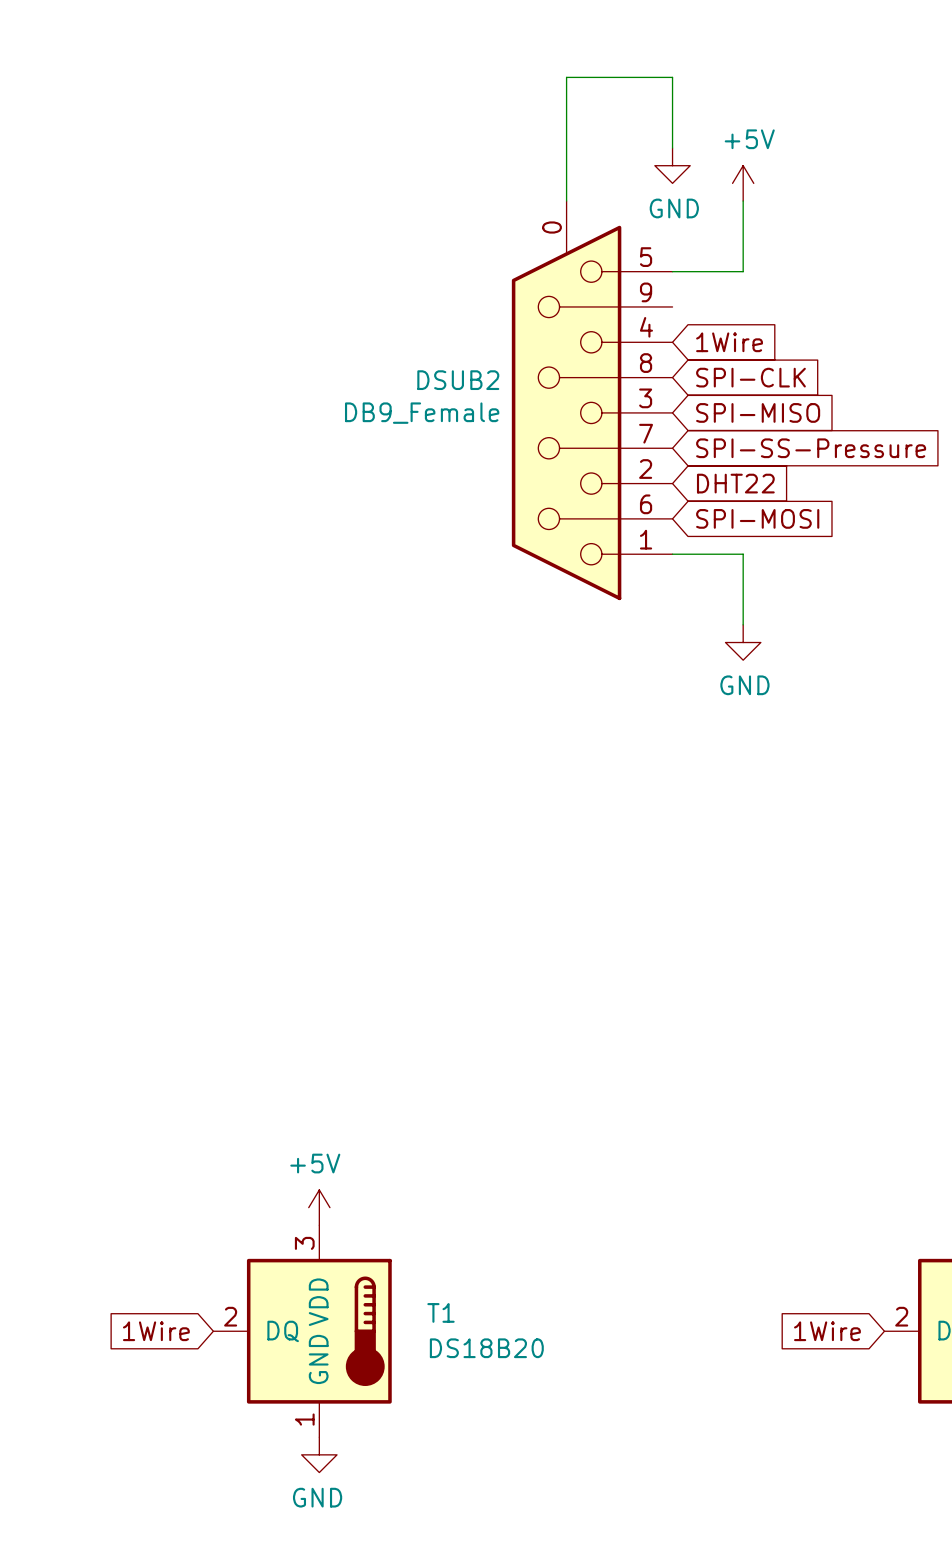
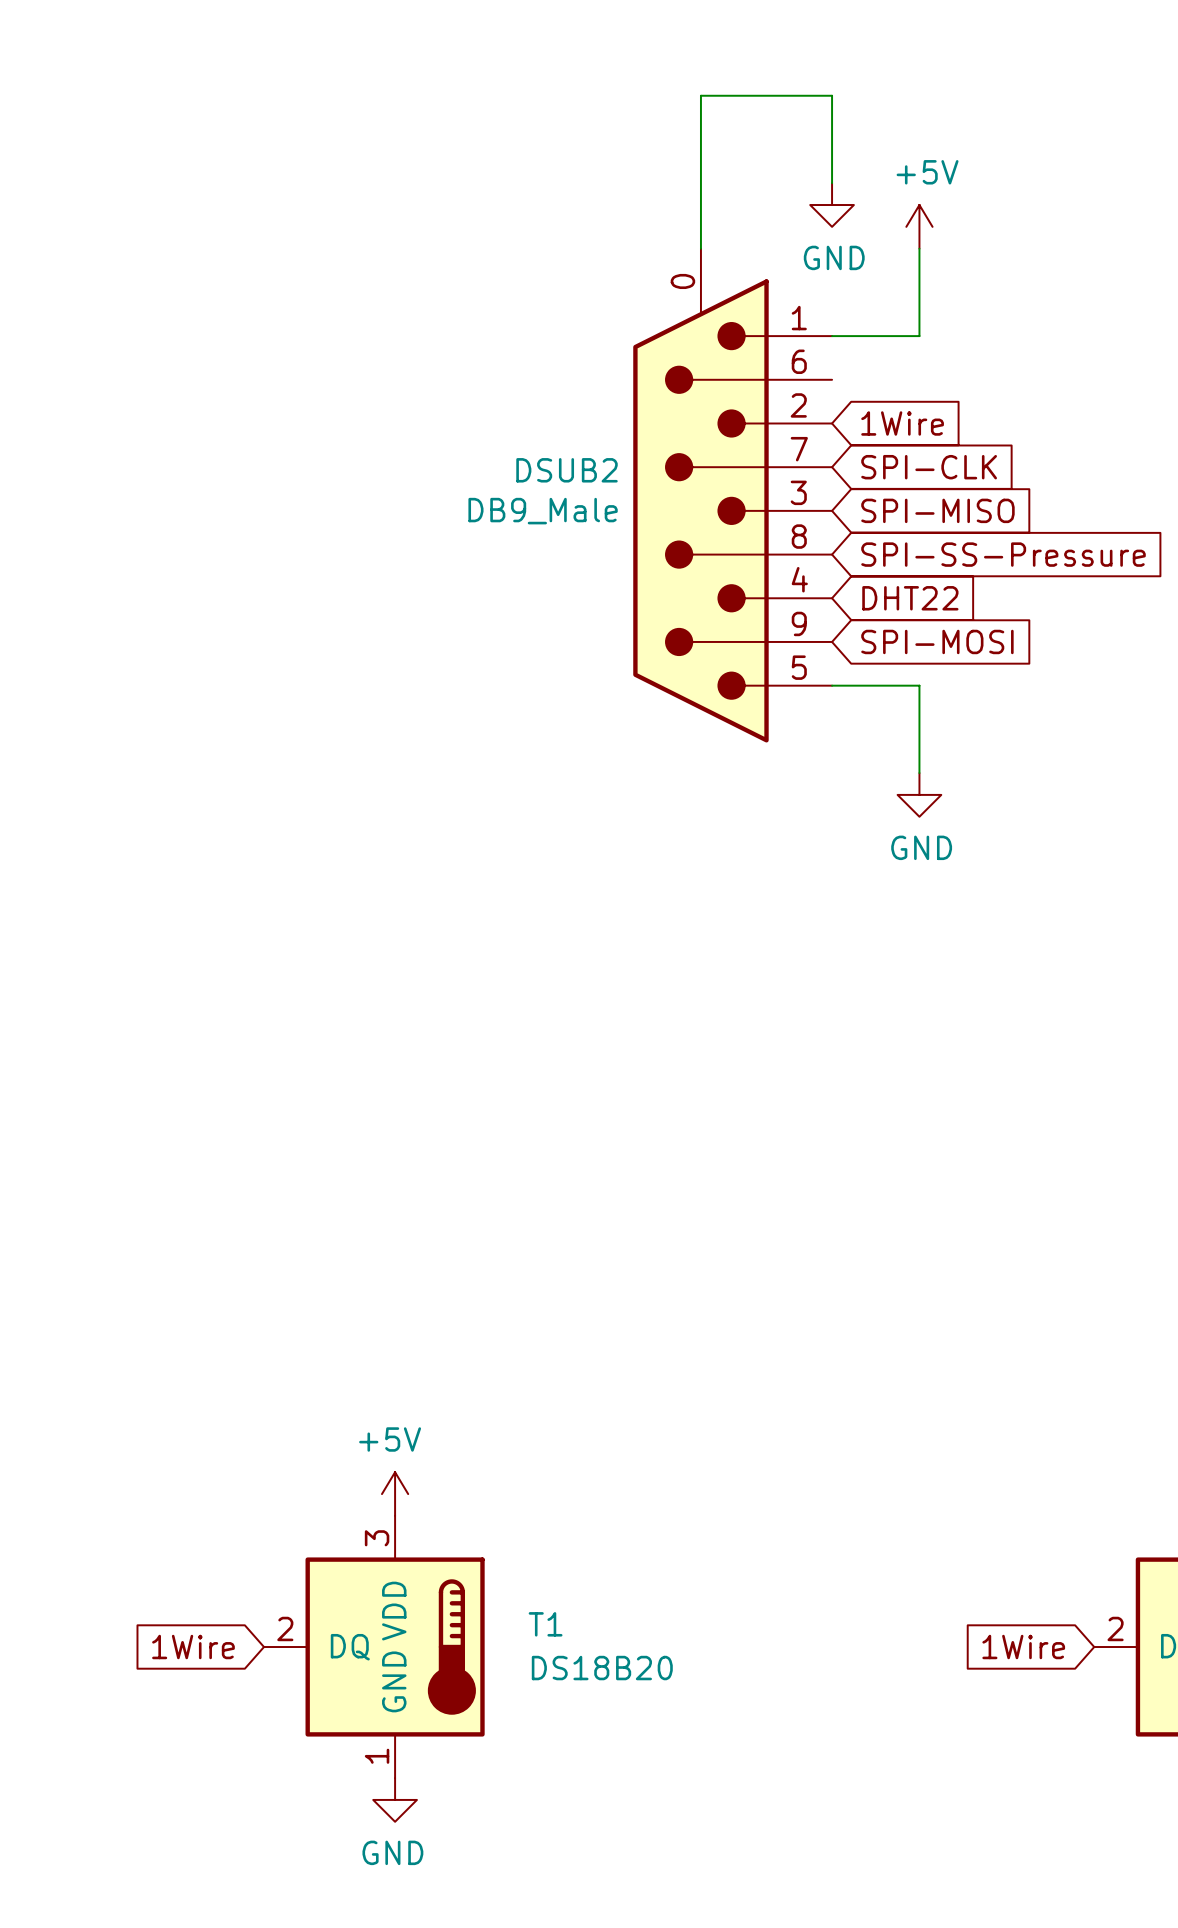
DSUB2 symbol: [511, 201, 673, 601] -> [633, 248, 833, 743]
DSUB2 value: DB9_Female (422, 413) -> DB9_Male (543, 511)

